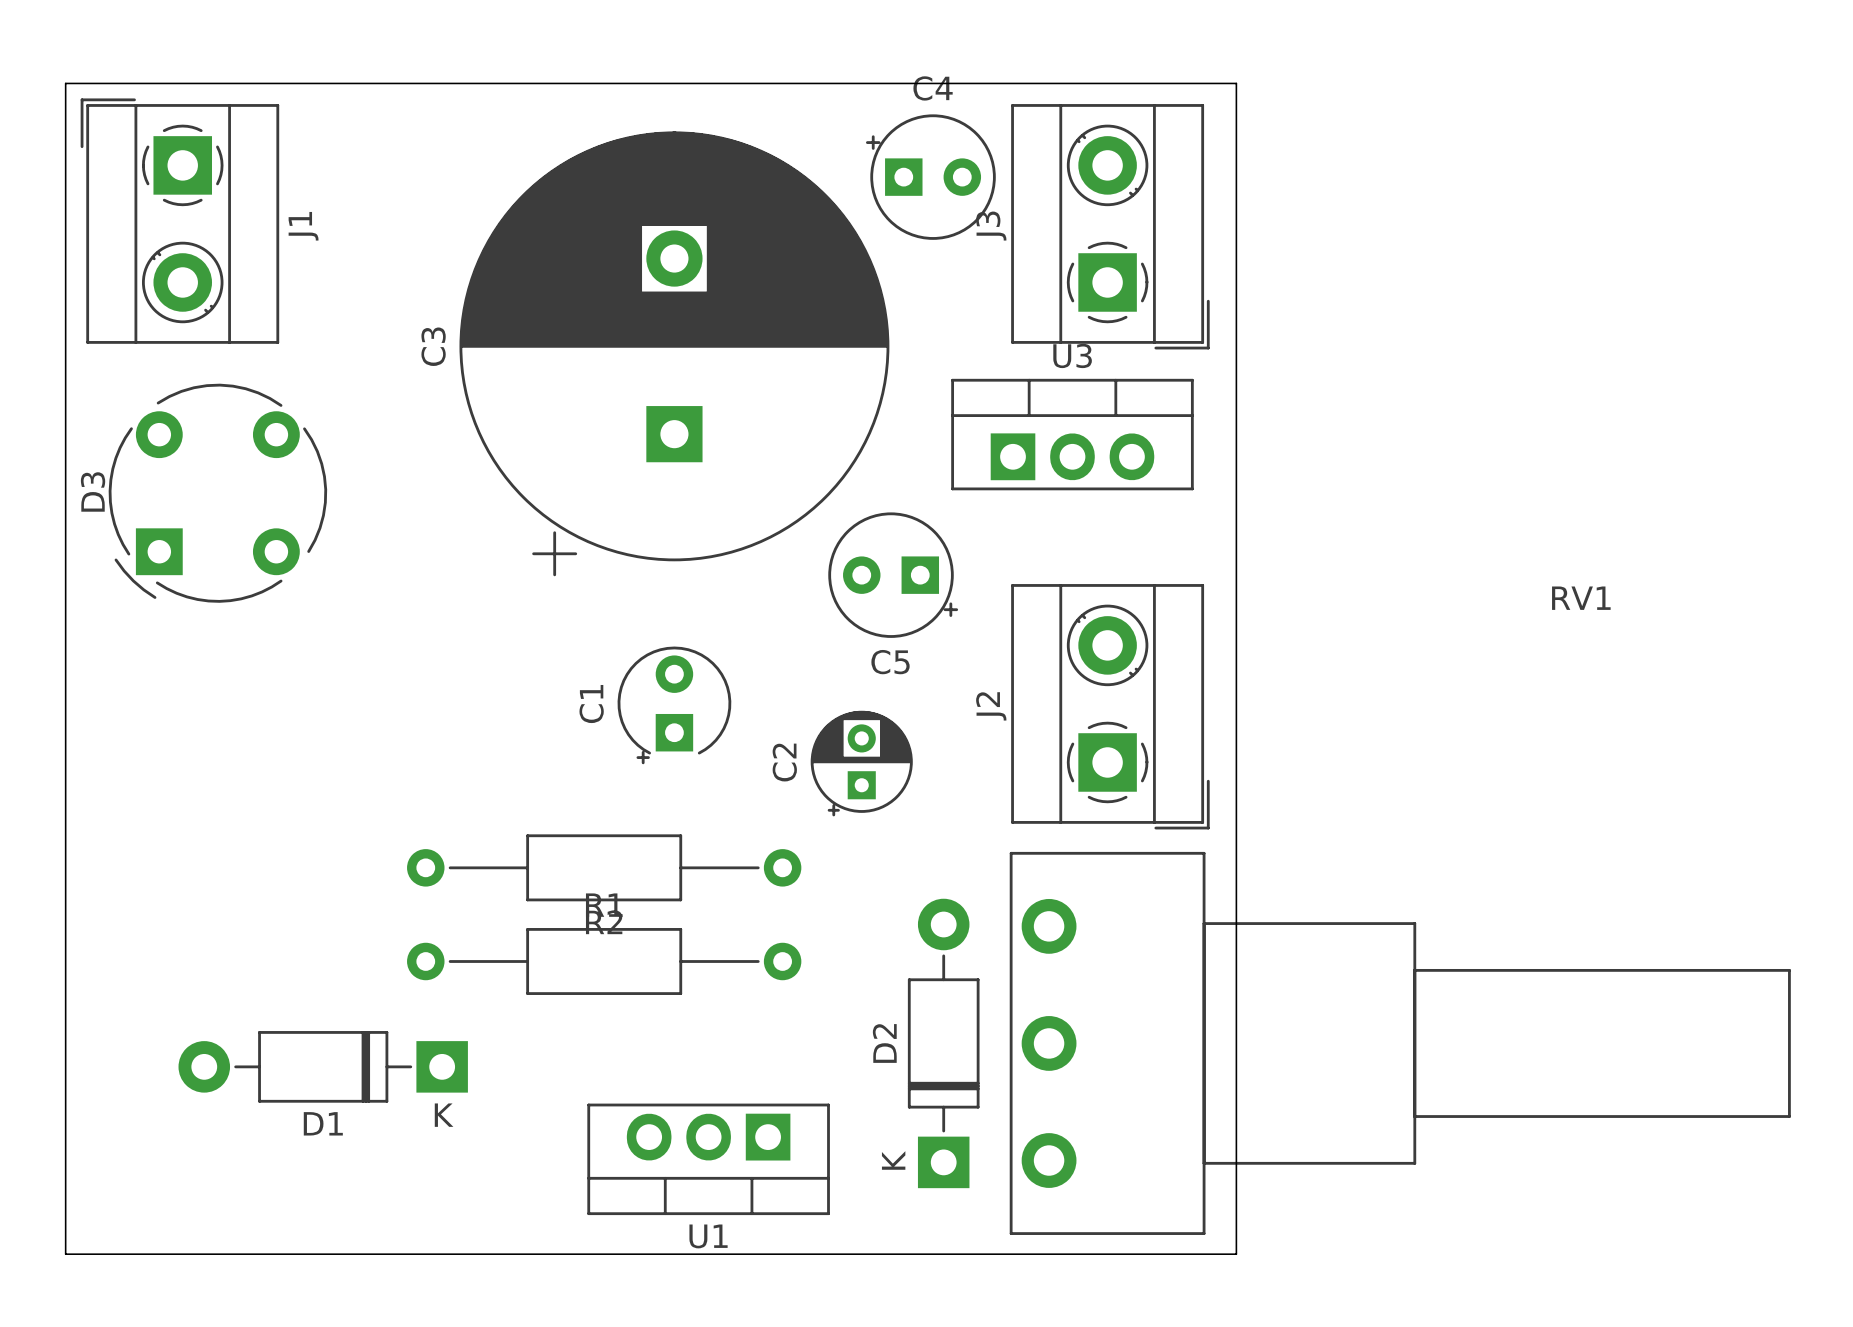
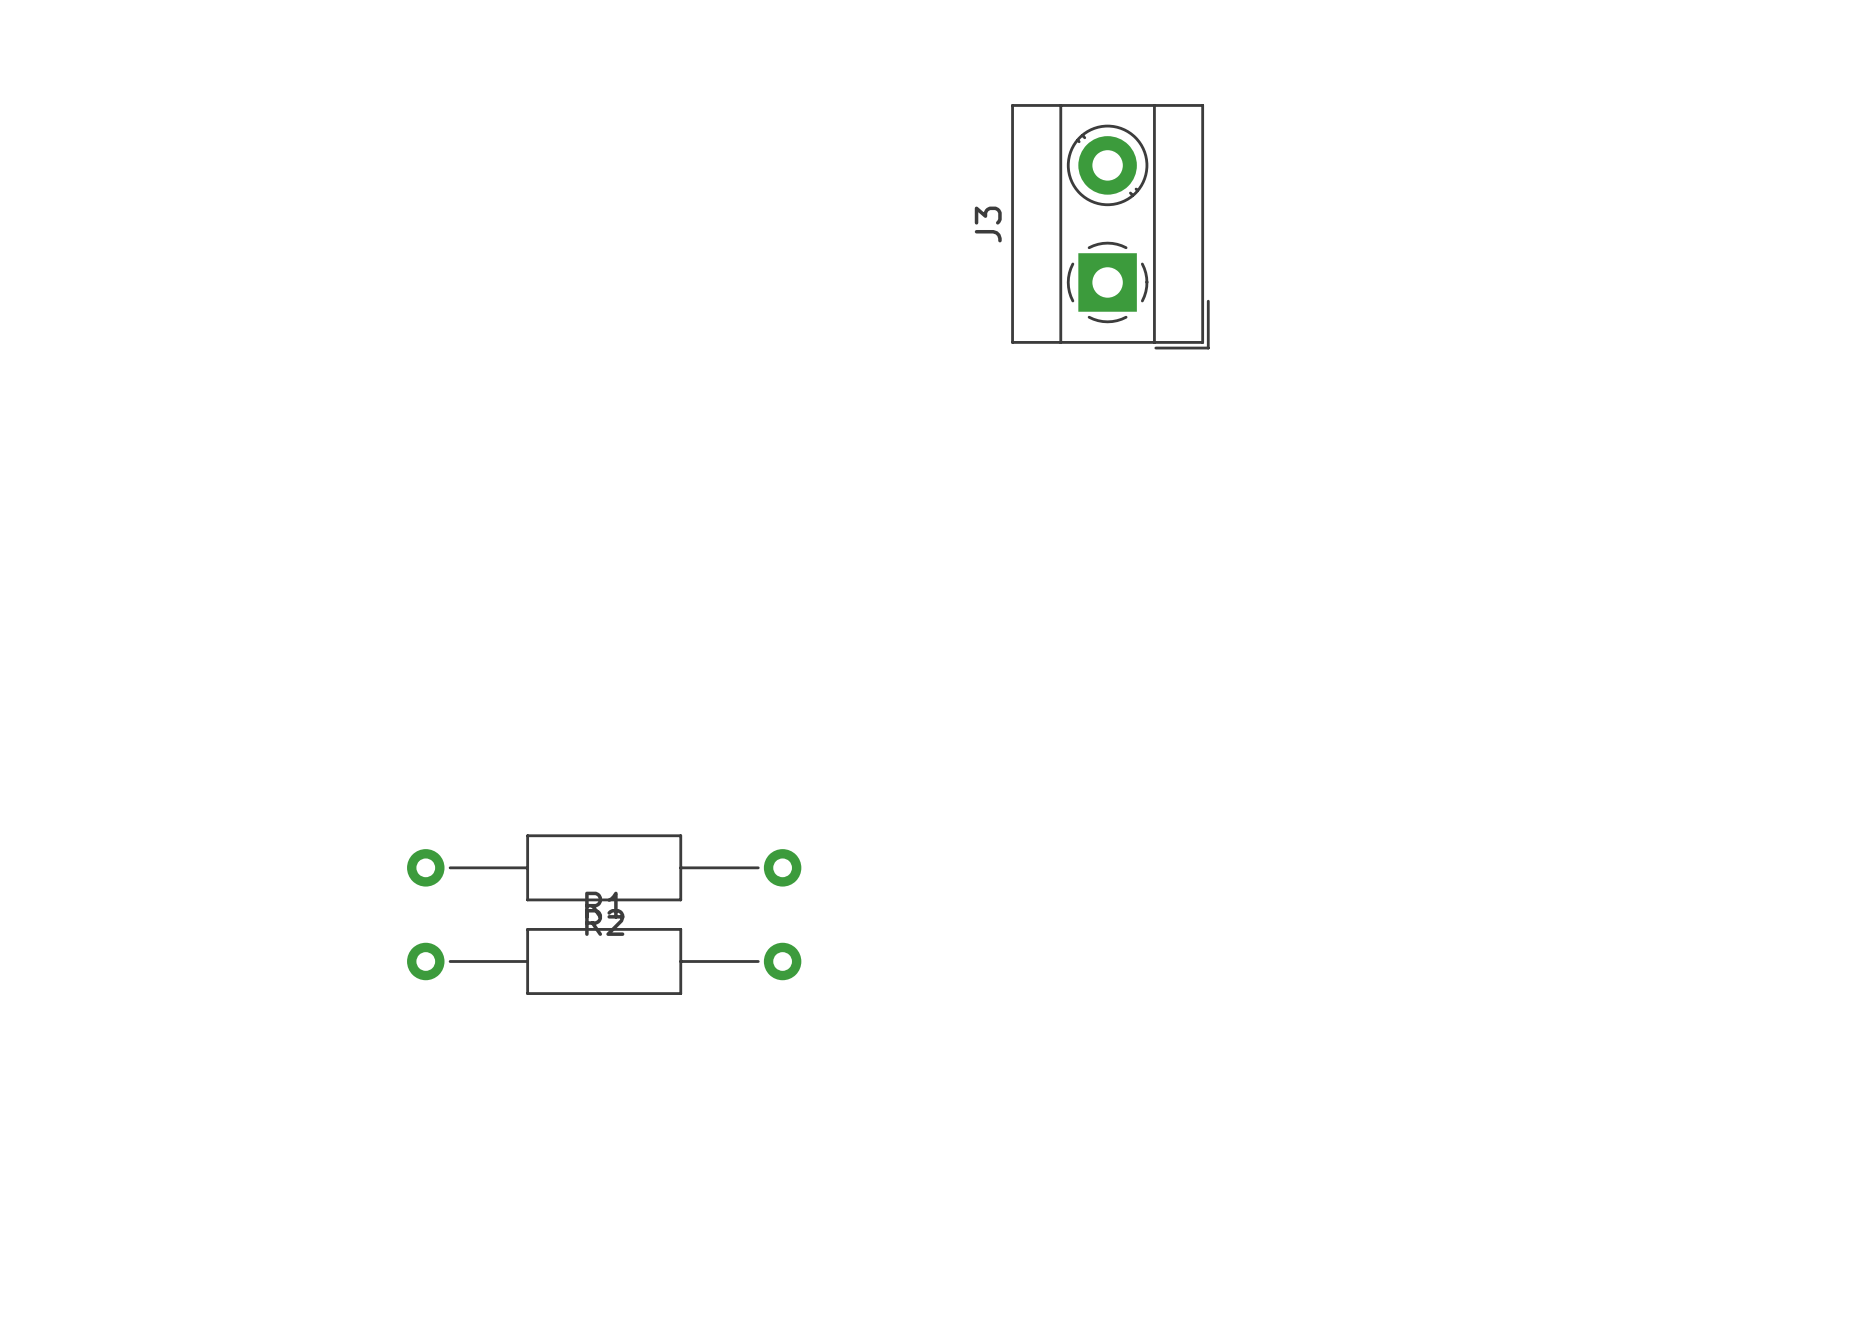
board edge: (65, 83) (1236, 83) (1236, 1254) (65, 1254) (65, 83) -> none
C4: (930, 177) -> none
J1: (179, 221) -> none
C3: (674, 353) -> none
U3: (1072, 434) -> none
D3: (217, 493) -> none
C5: (893, 575) -> none
C1: (674, 705) -> none
J2: (1110, 706) -> none
C2: (861, 763) -> none
D2: (943, 1043) -> none
RV1: (1400, 1043) -> none
D1: (323, 1066) -> none
U1: (708, 1159) -> none

